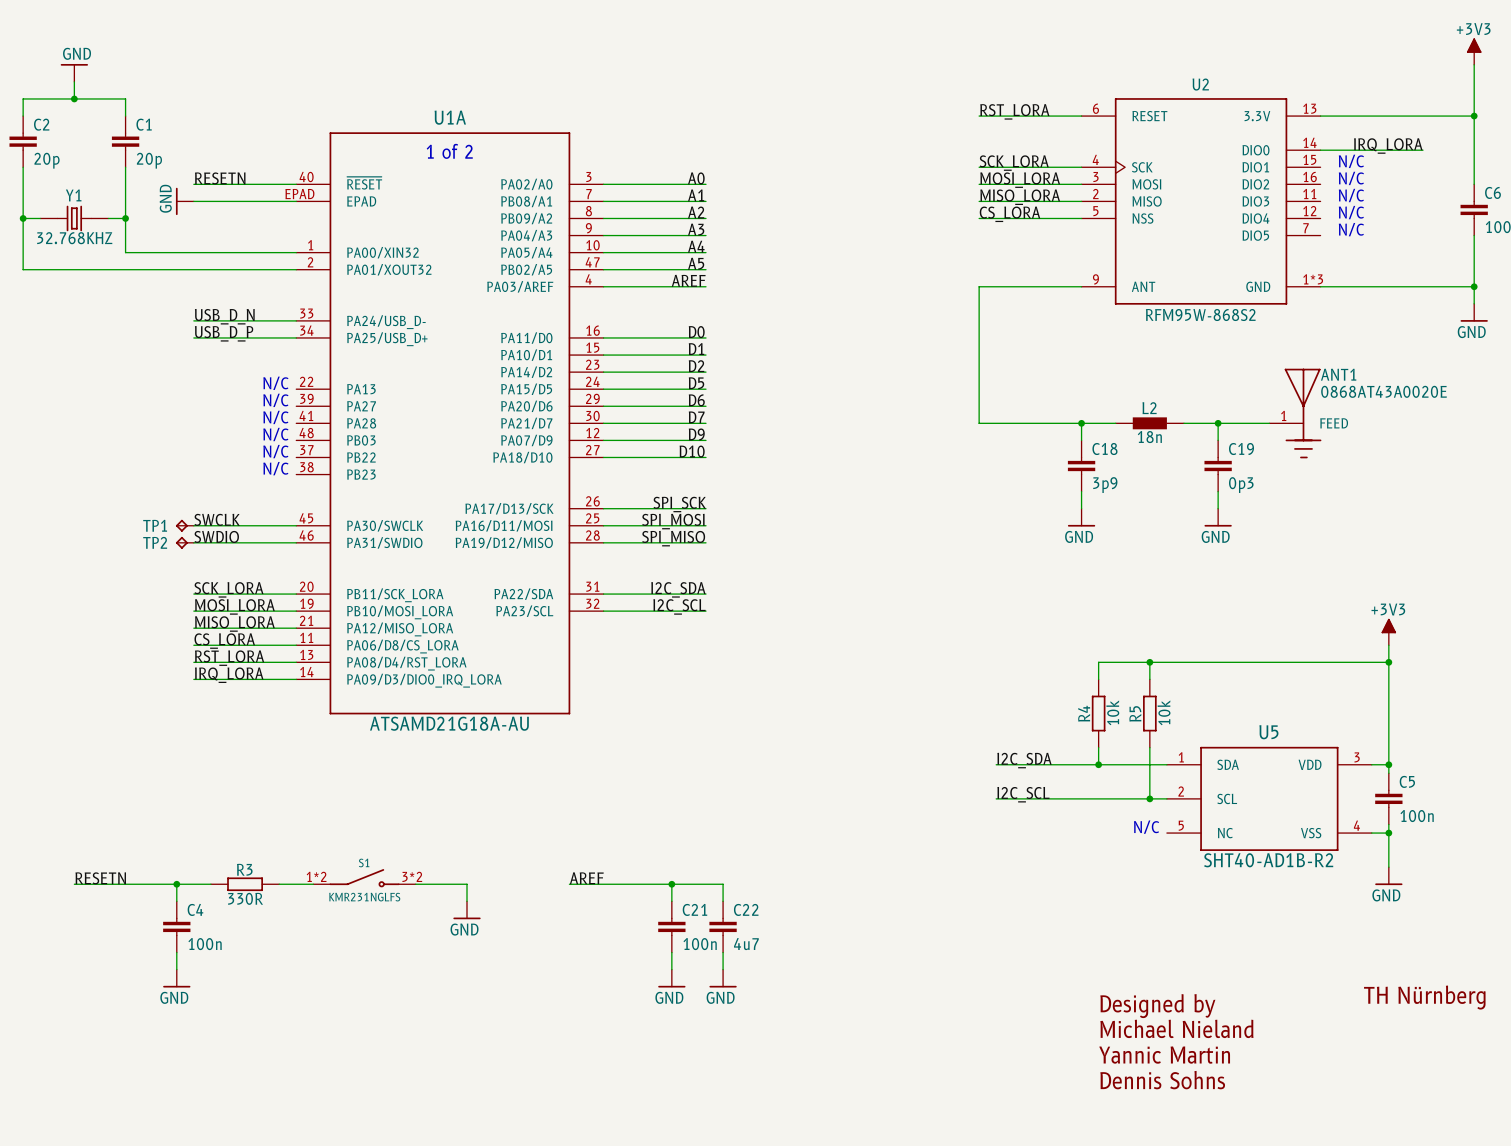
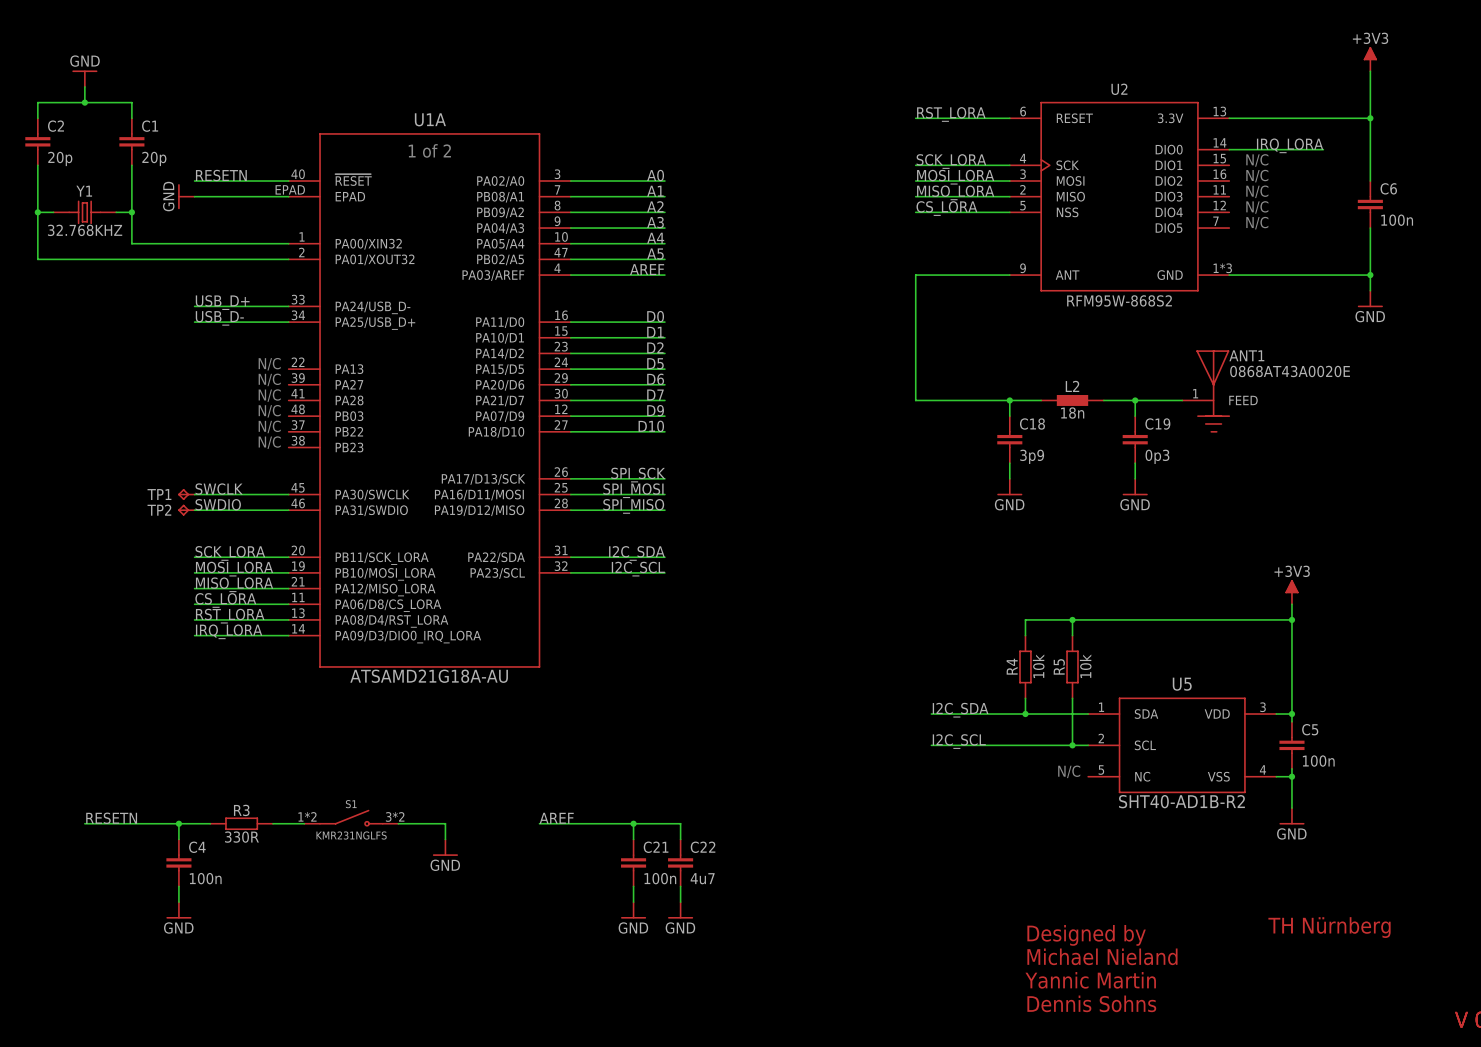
label: USB_D_N (224, 316) -> USB_D+ (222, 302)
label: USB_D_P (224, 333) -> USB_D- (219, 318)

